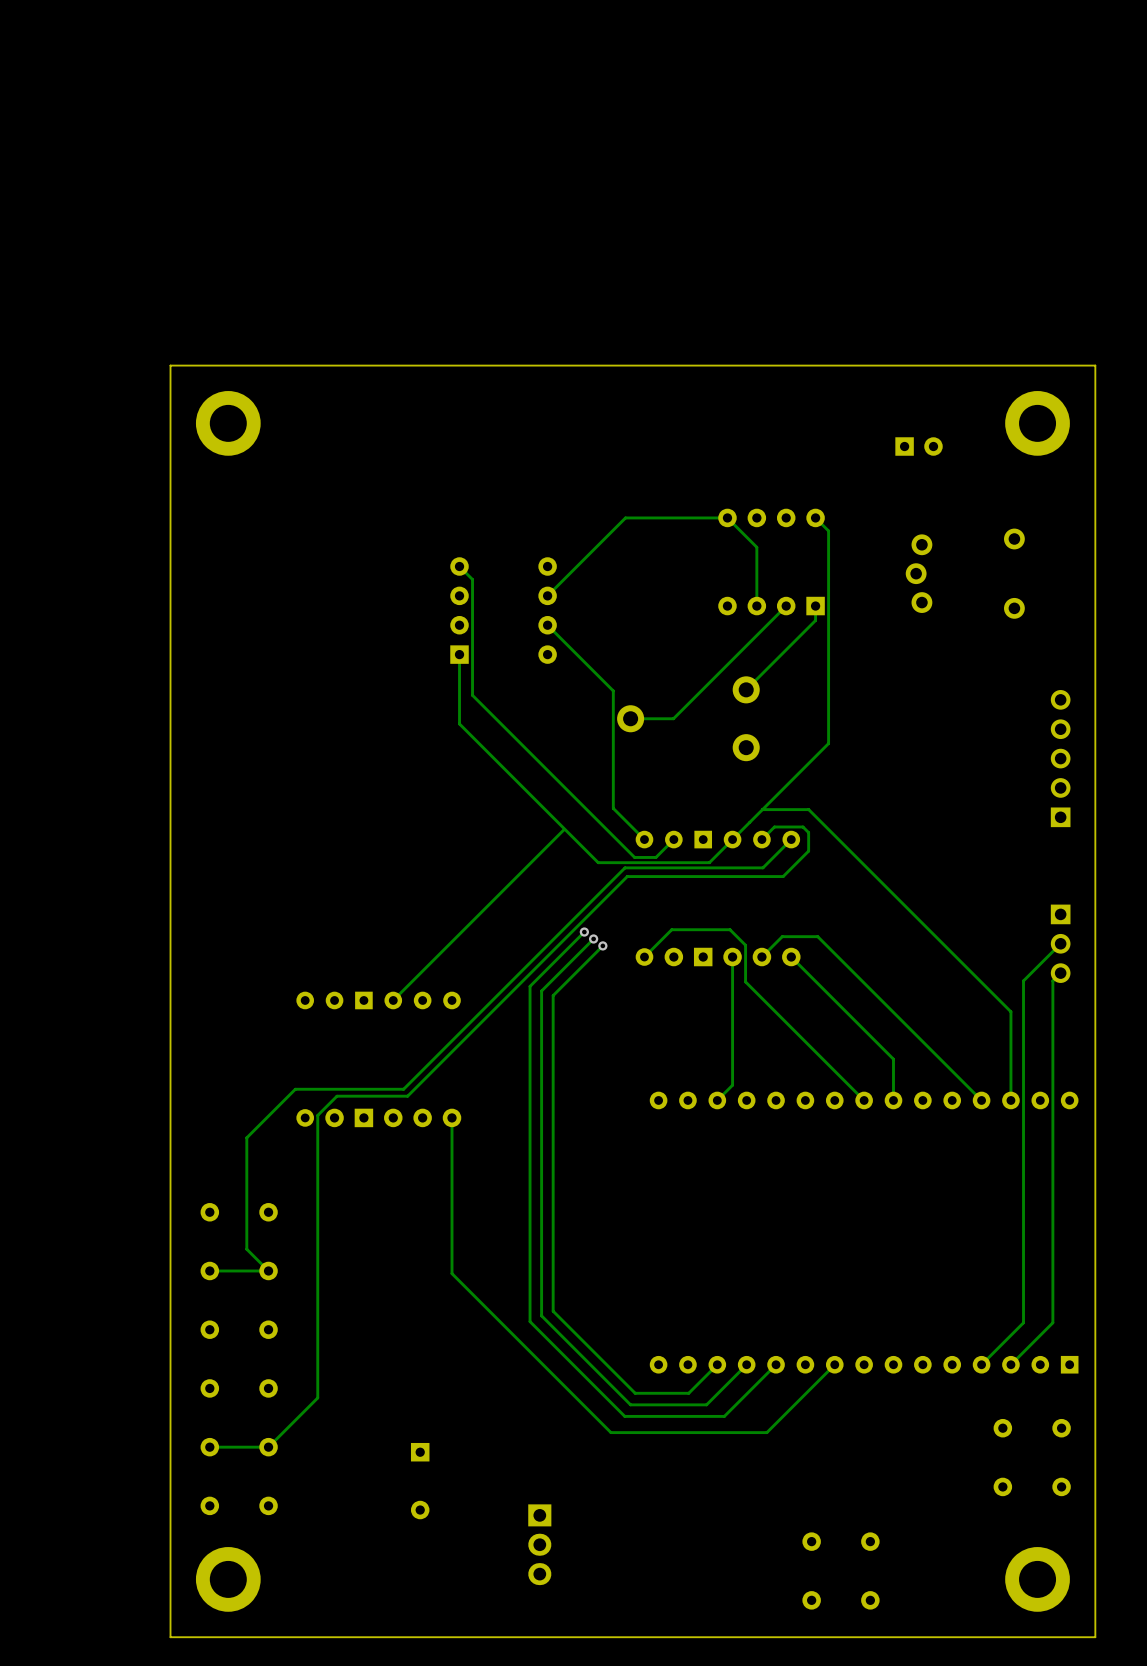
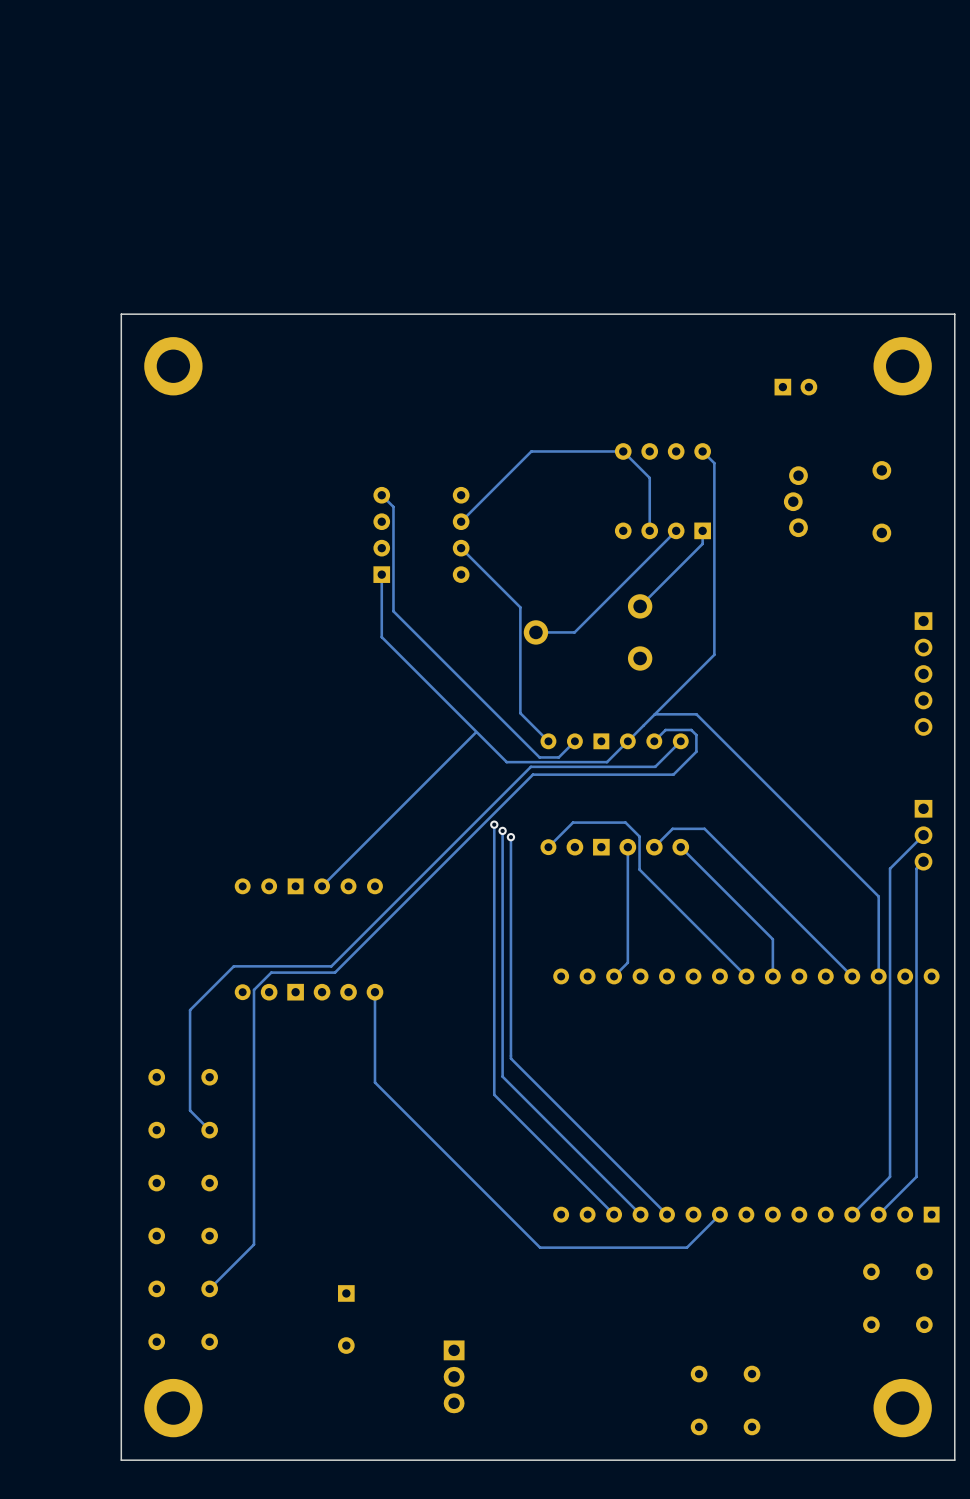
part rotation: 0° (1060, 758) -> 180° (923, 674)
track: (584, 932) (530, 986) (530, 1321) (624, 1416) (724, 1416) (776, 1364) -> (510, 837) (510, 1058) (667, 1214)
track: (593, 938) (541, 991) (541, 1315) (630, 1404) (706, 1404) (746, 1364) -> (502, 830) (502, 1076) (640, 1214)
track: (602, 945) (553, 995) (553, 1311) (635, 1393) (688, 1393) (717, 1364) -> (494, 824) (494, 1094) (614, 1214)
track: (452, 1218) (452, 1273) (610, 1432) (766, 1432) (798, 1401) -> (374, 1082) (540, 1247) (686, 1247)
track: (268, 1270) (209, 1270) -> none
track: (268, 1447) (209, 1447) -> none

